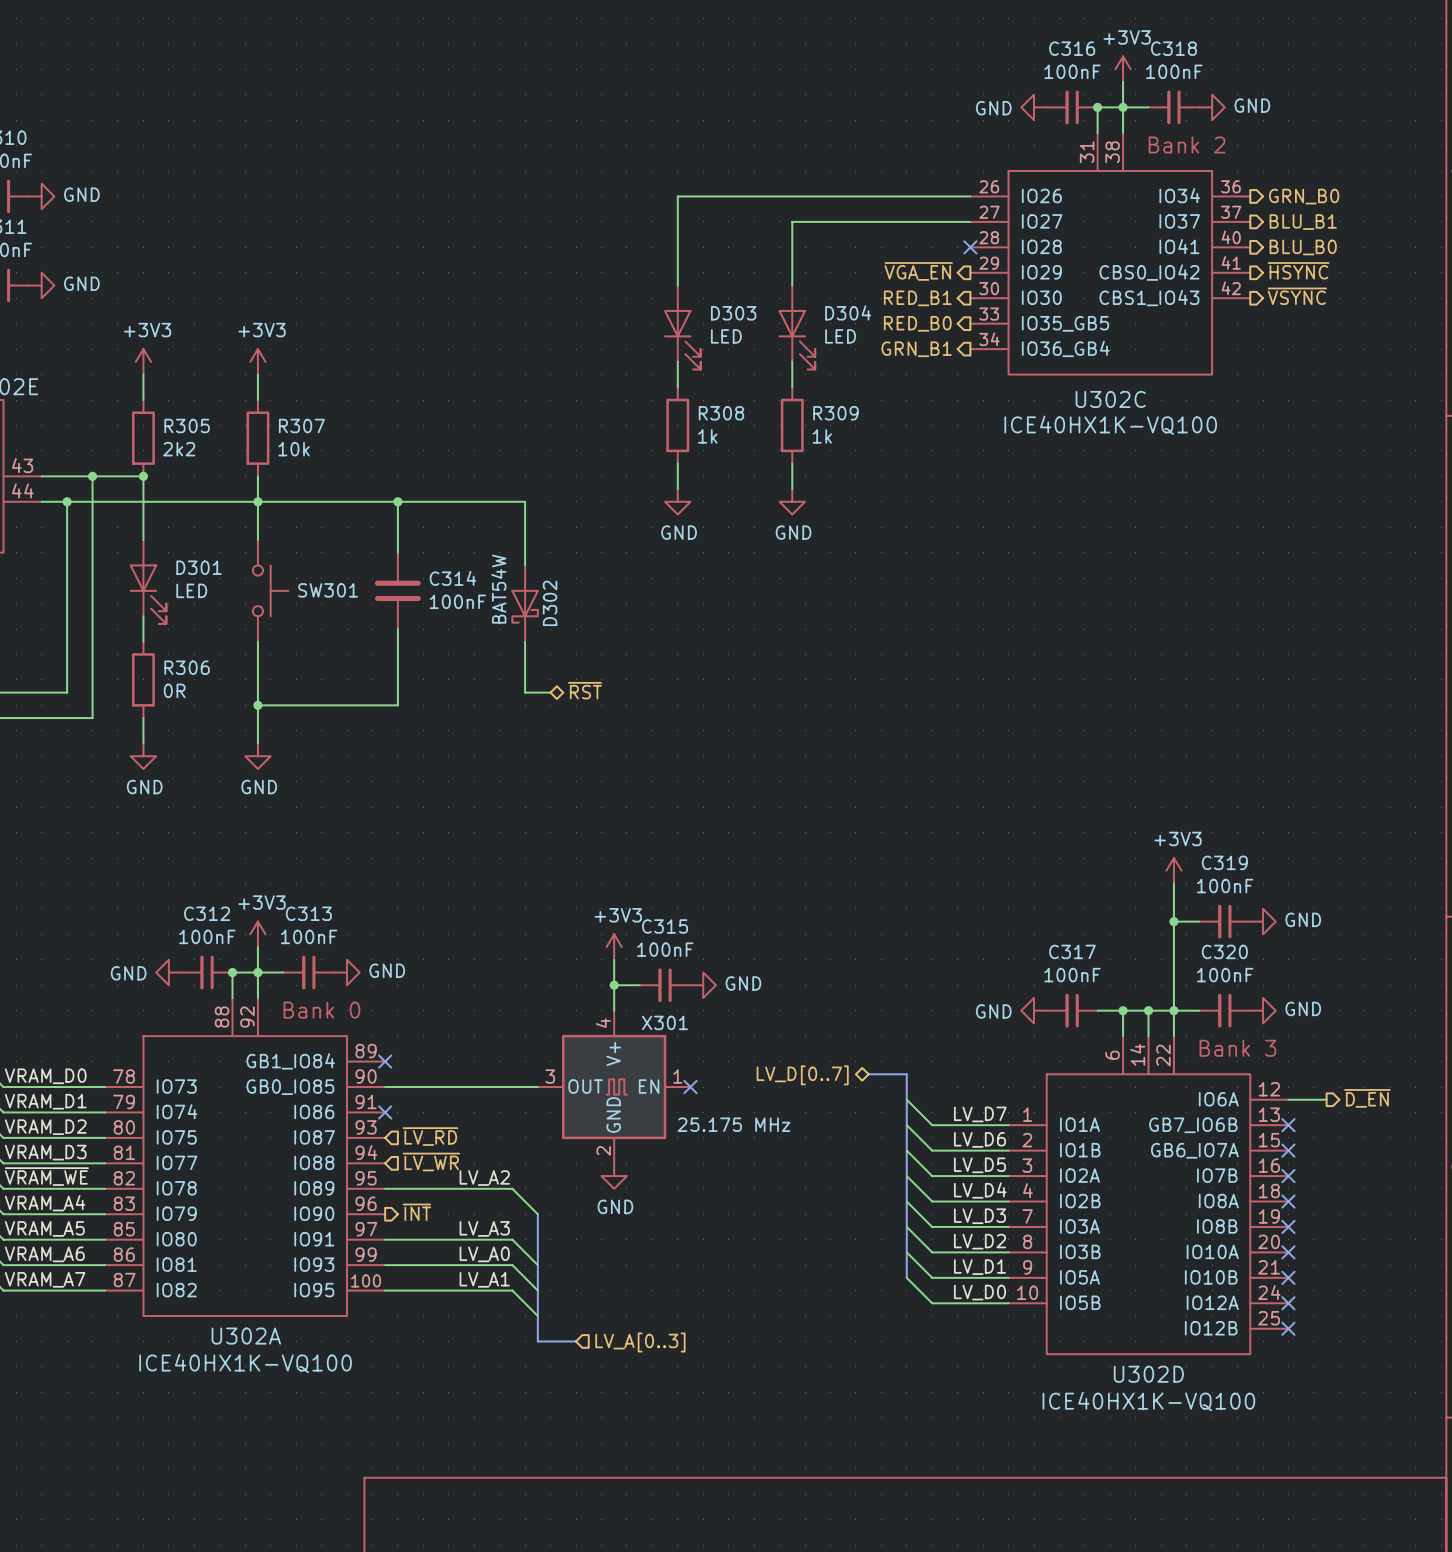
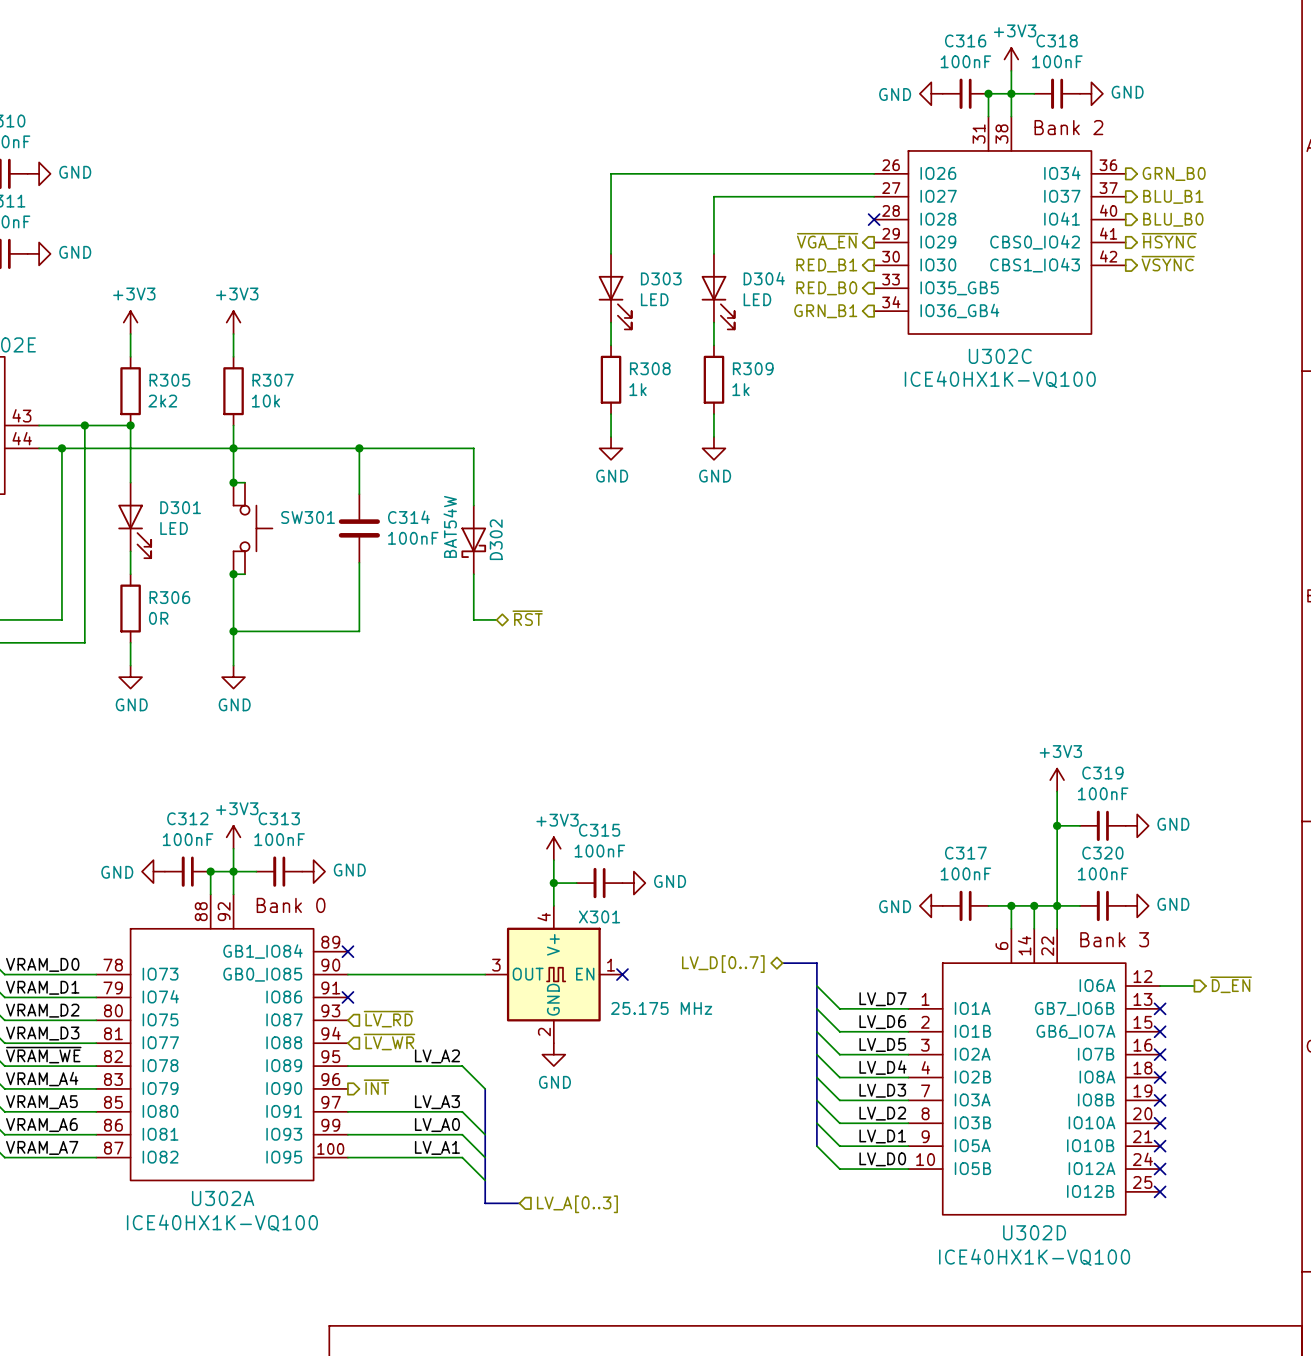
SW301 symbol: [252, 539, 289, 642] -> [233, 482, 273, 575]
wire: none -> (233, 482) (244, 482)
junction: none -> (233, 482)
wire: none -> (233, 574) (244, 574)
junction: none -> (233, 574)

